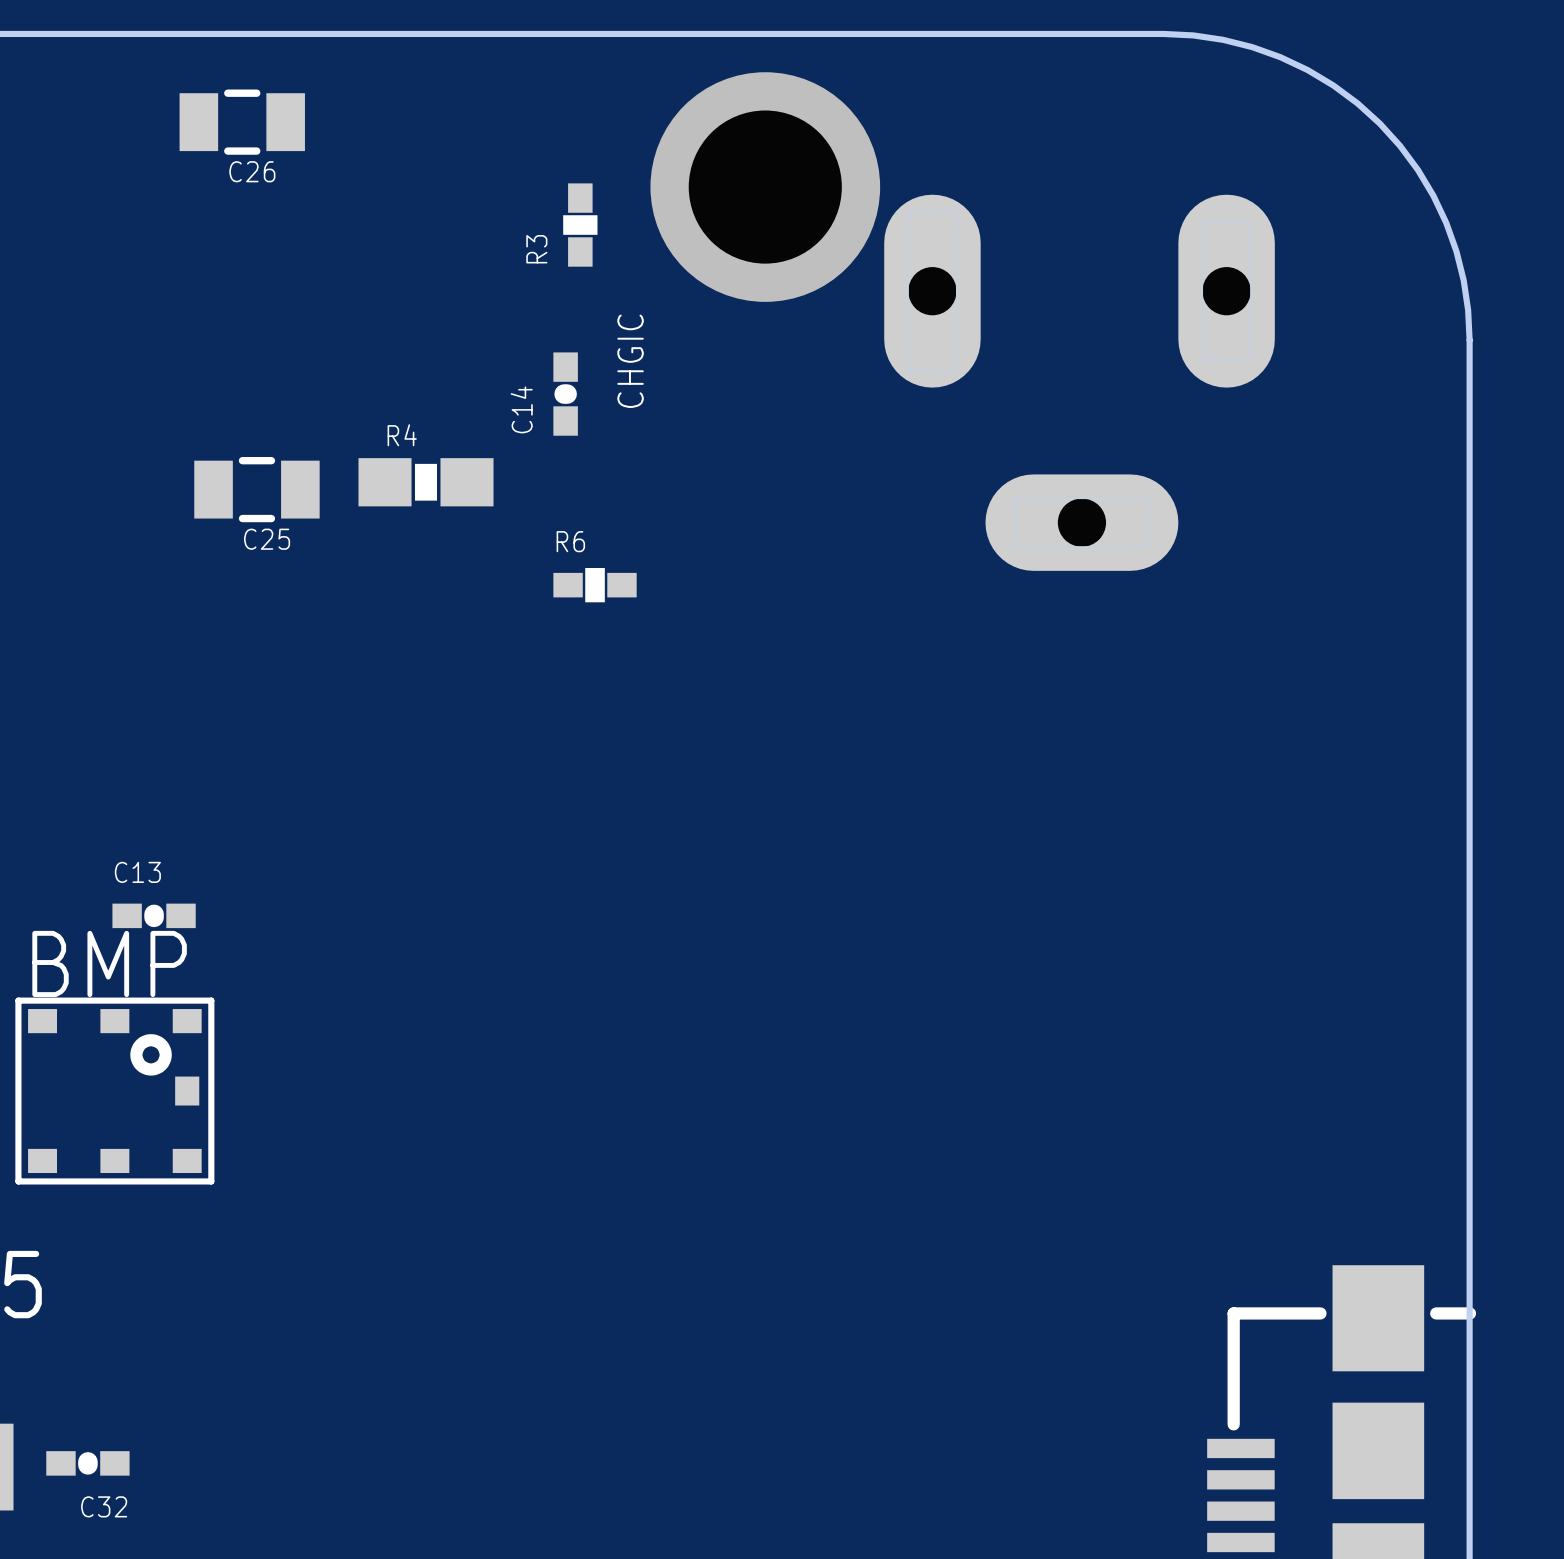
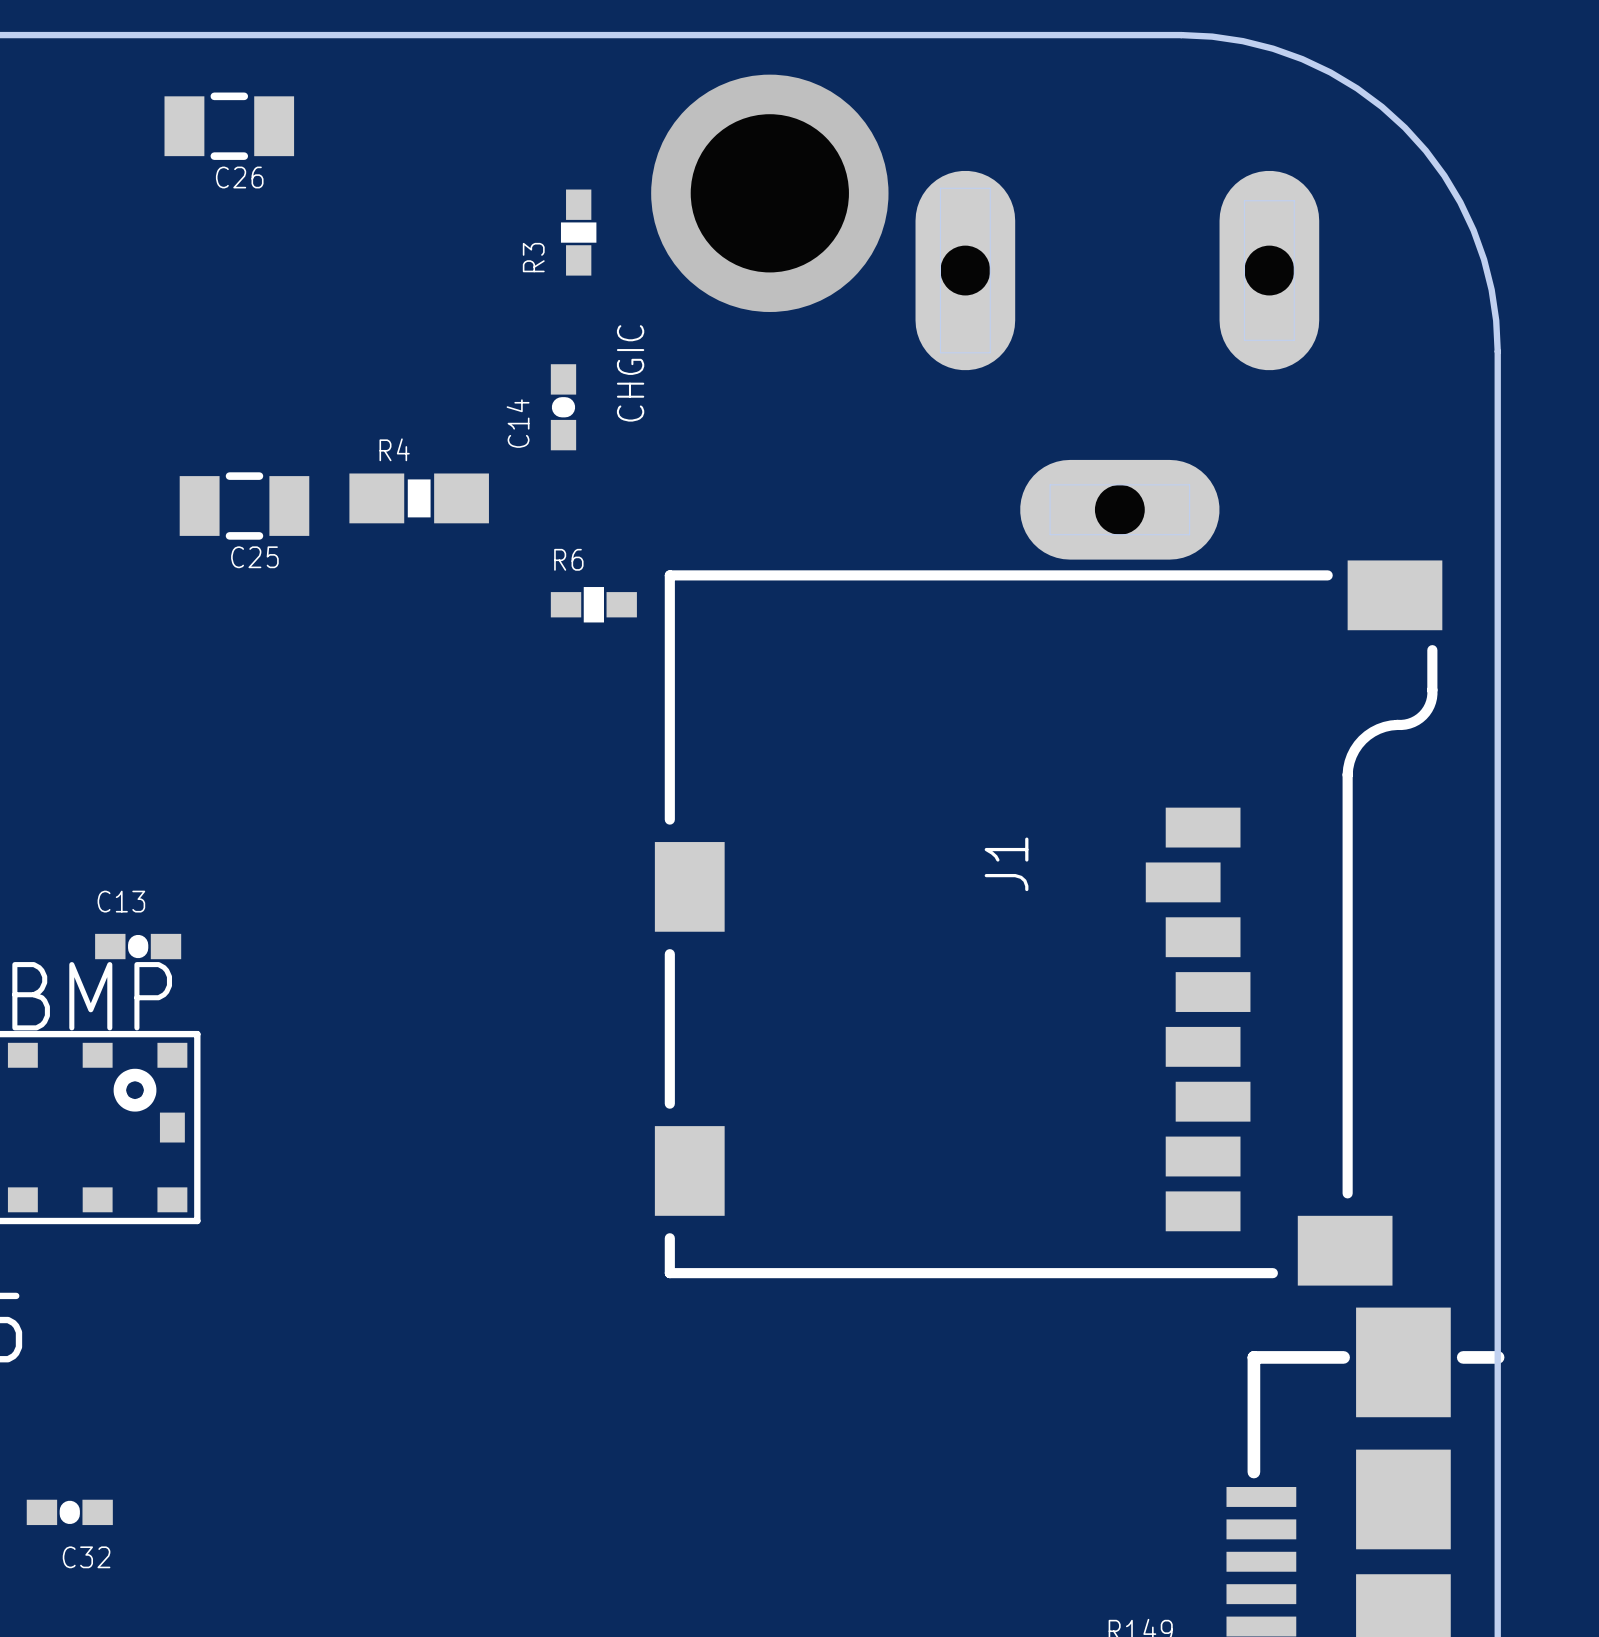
part position: (1079, 382) -> (1117, 365)
J1: none -> (1048, 923)

